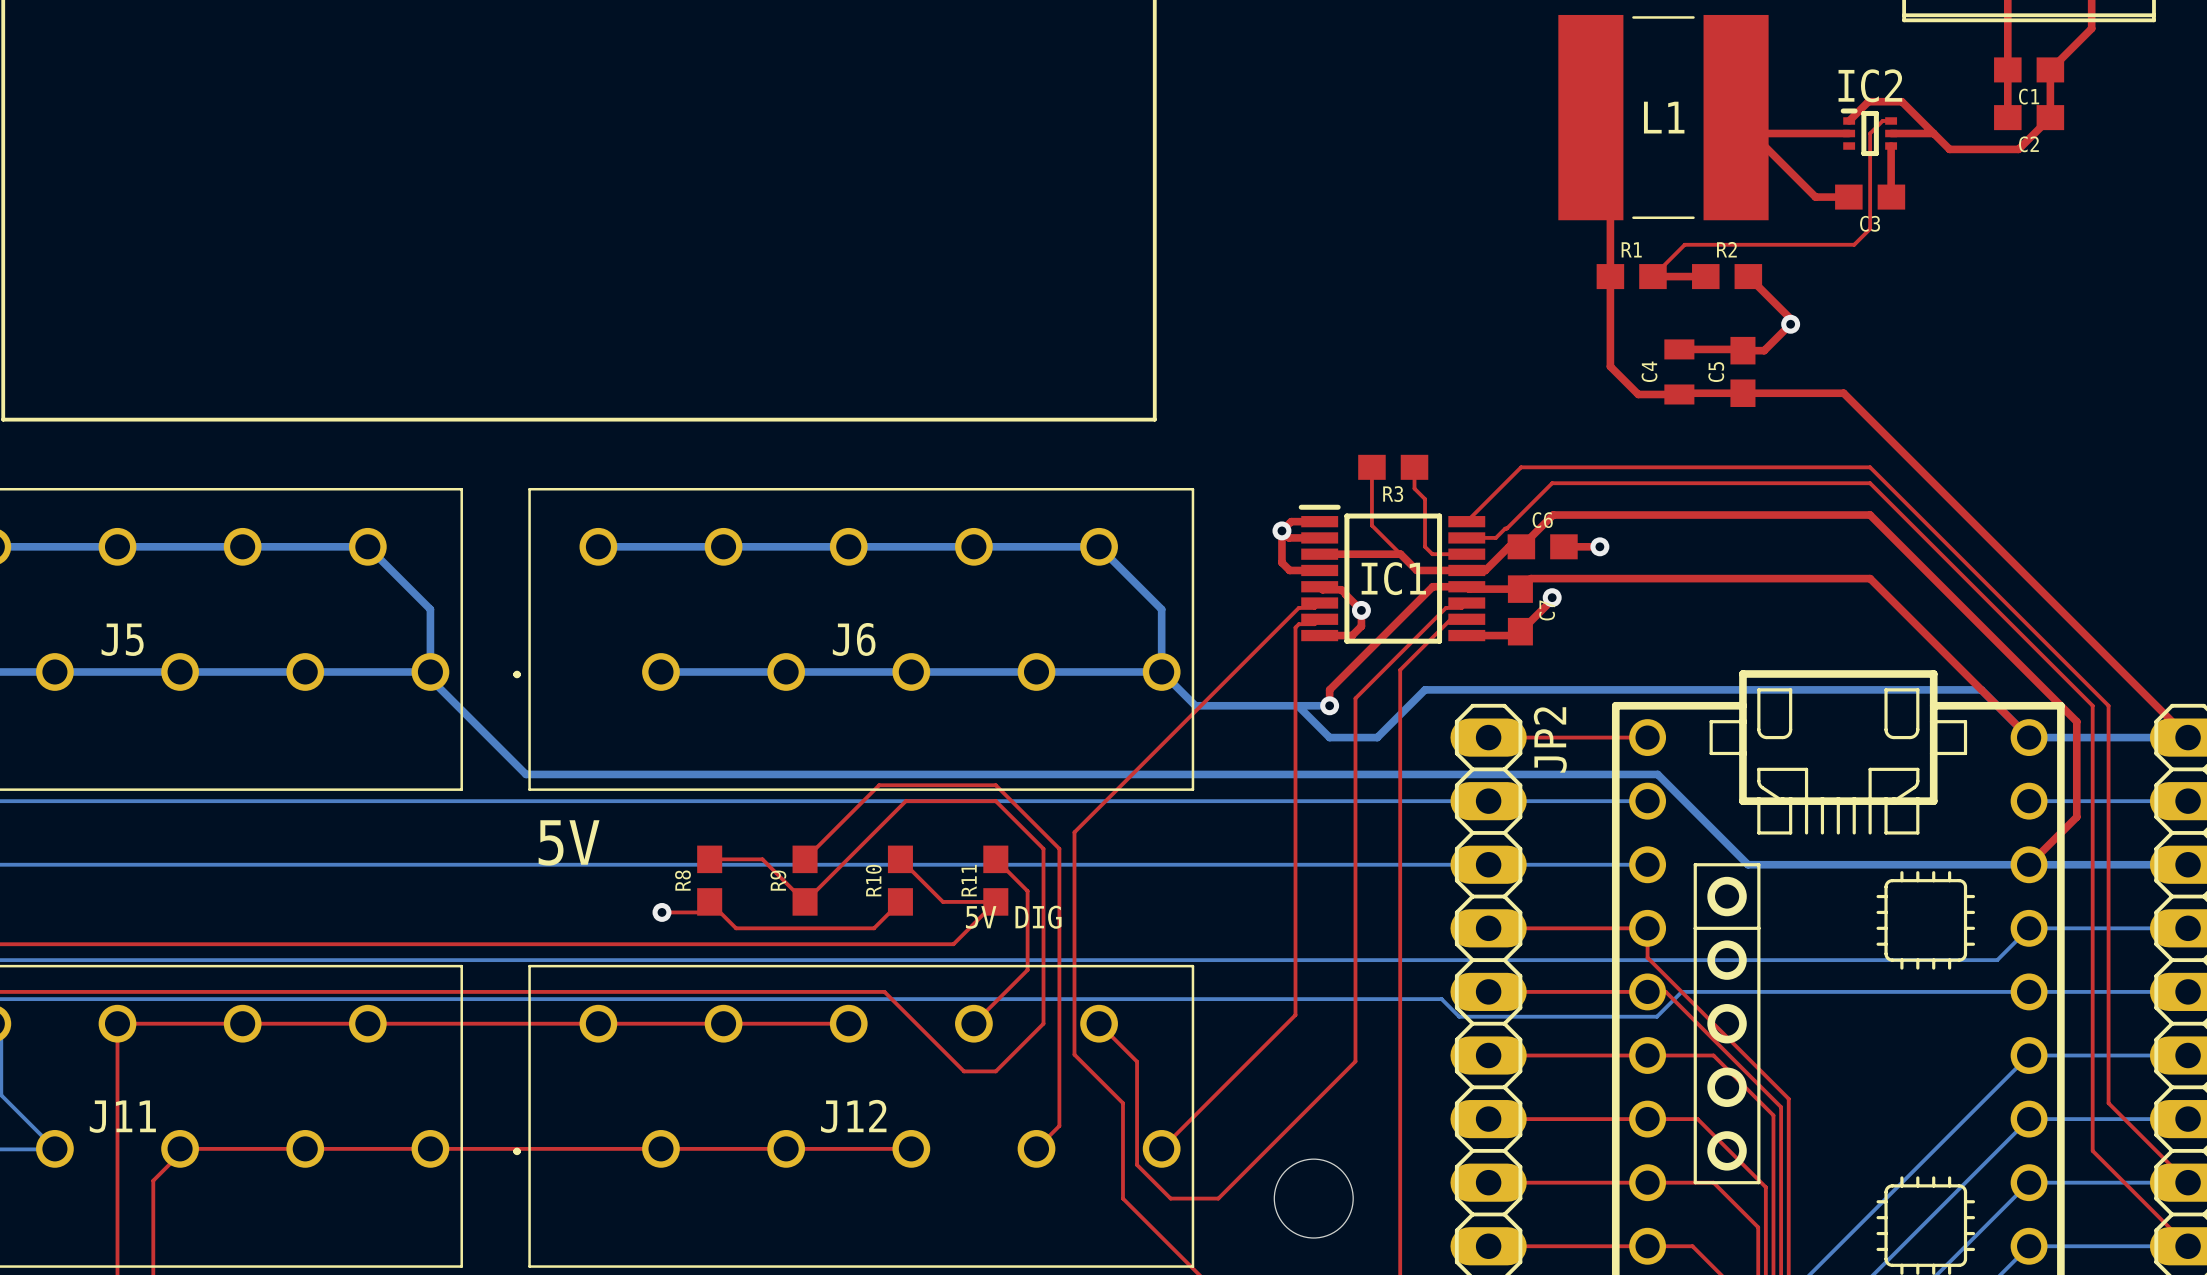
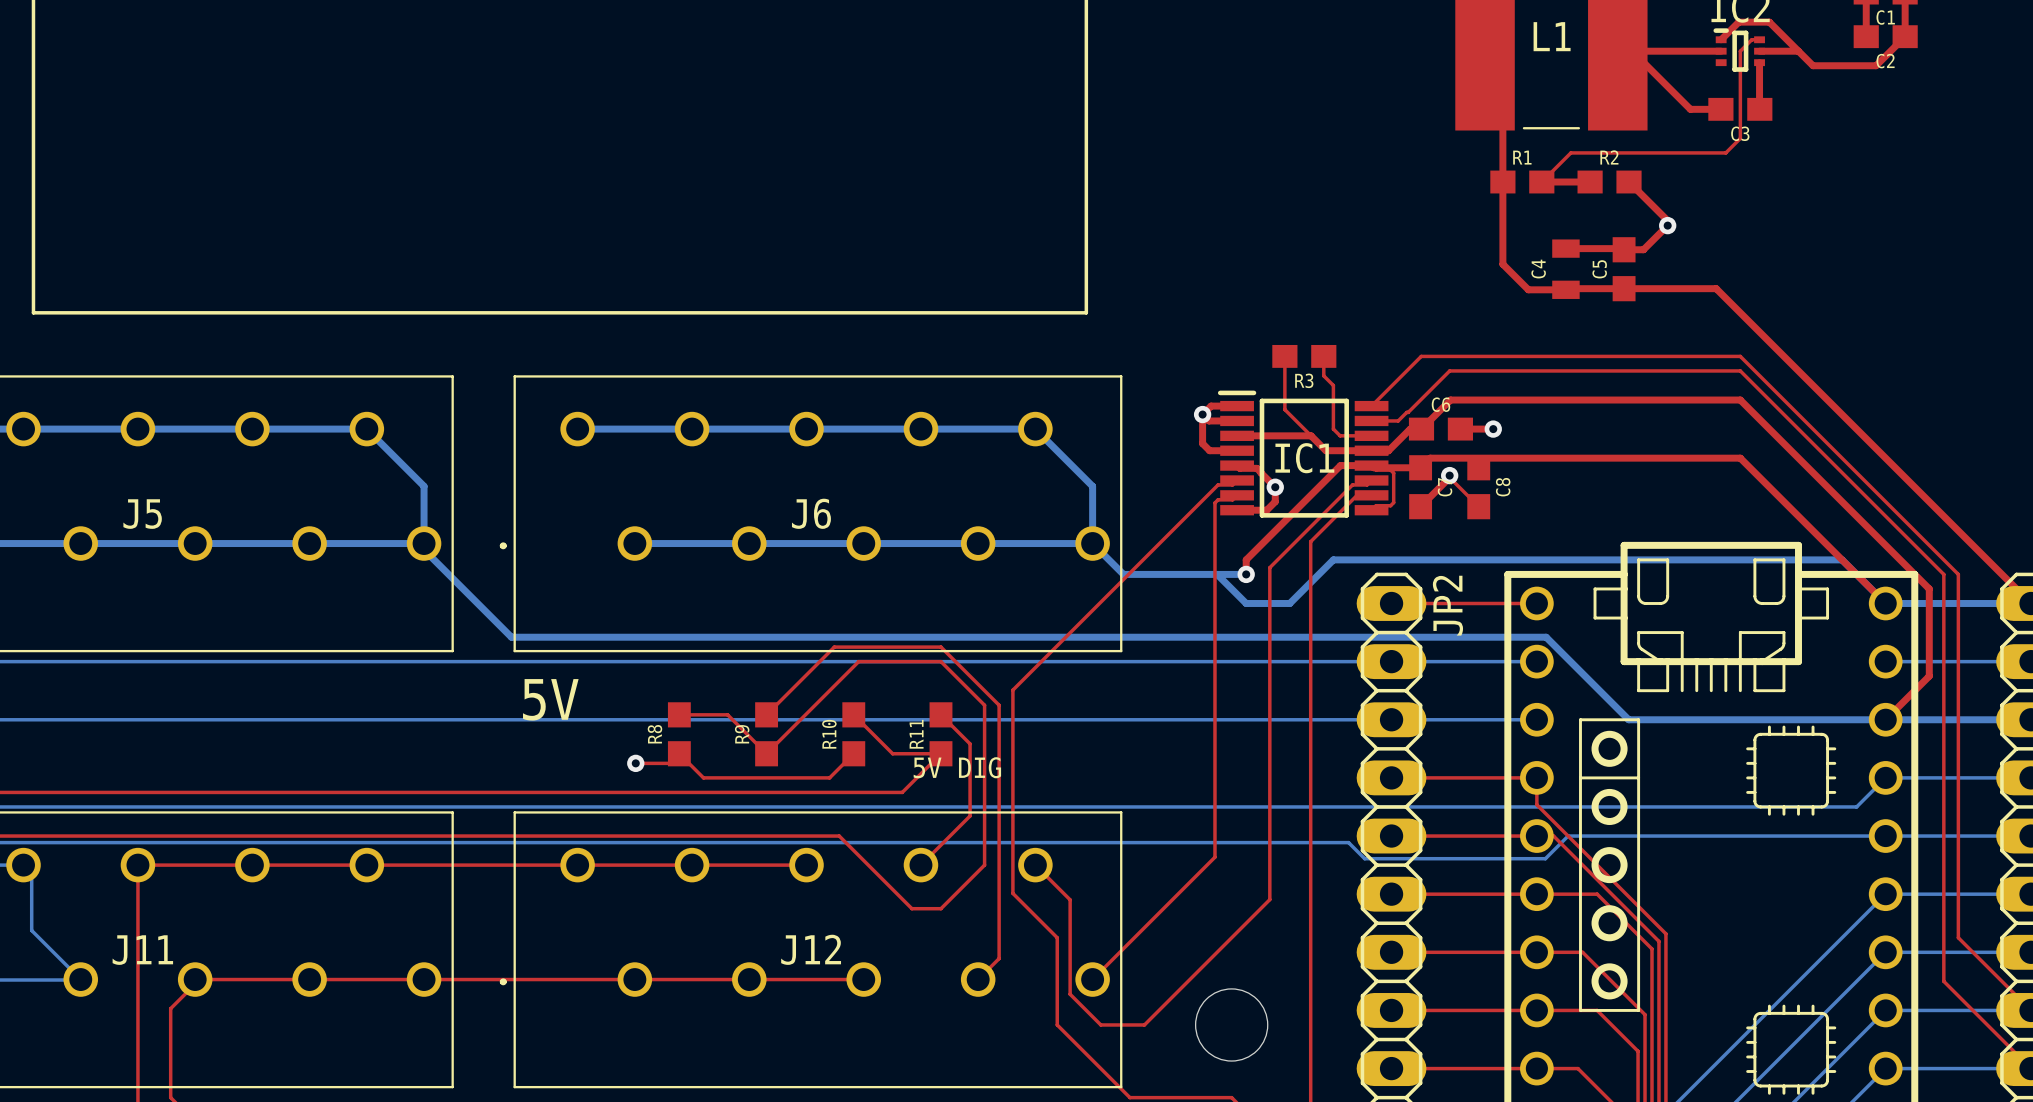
top track: none -> (1449, 477) (1478, 506)
C8: none -> (1478, 487)
top track: (1466, 635) (1516, 635) -> (1371, 510) (1376, 505) (1390, 505) (1393, 502) (1393, 473) (1390, 470) (1376, 470) (1371, 465)

